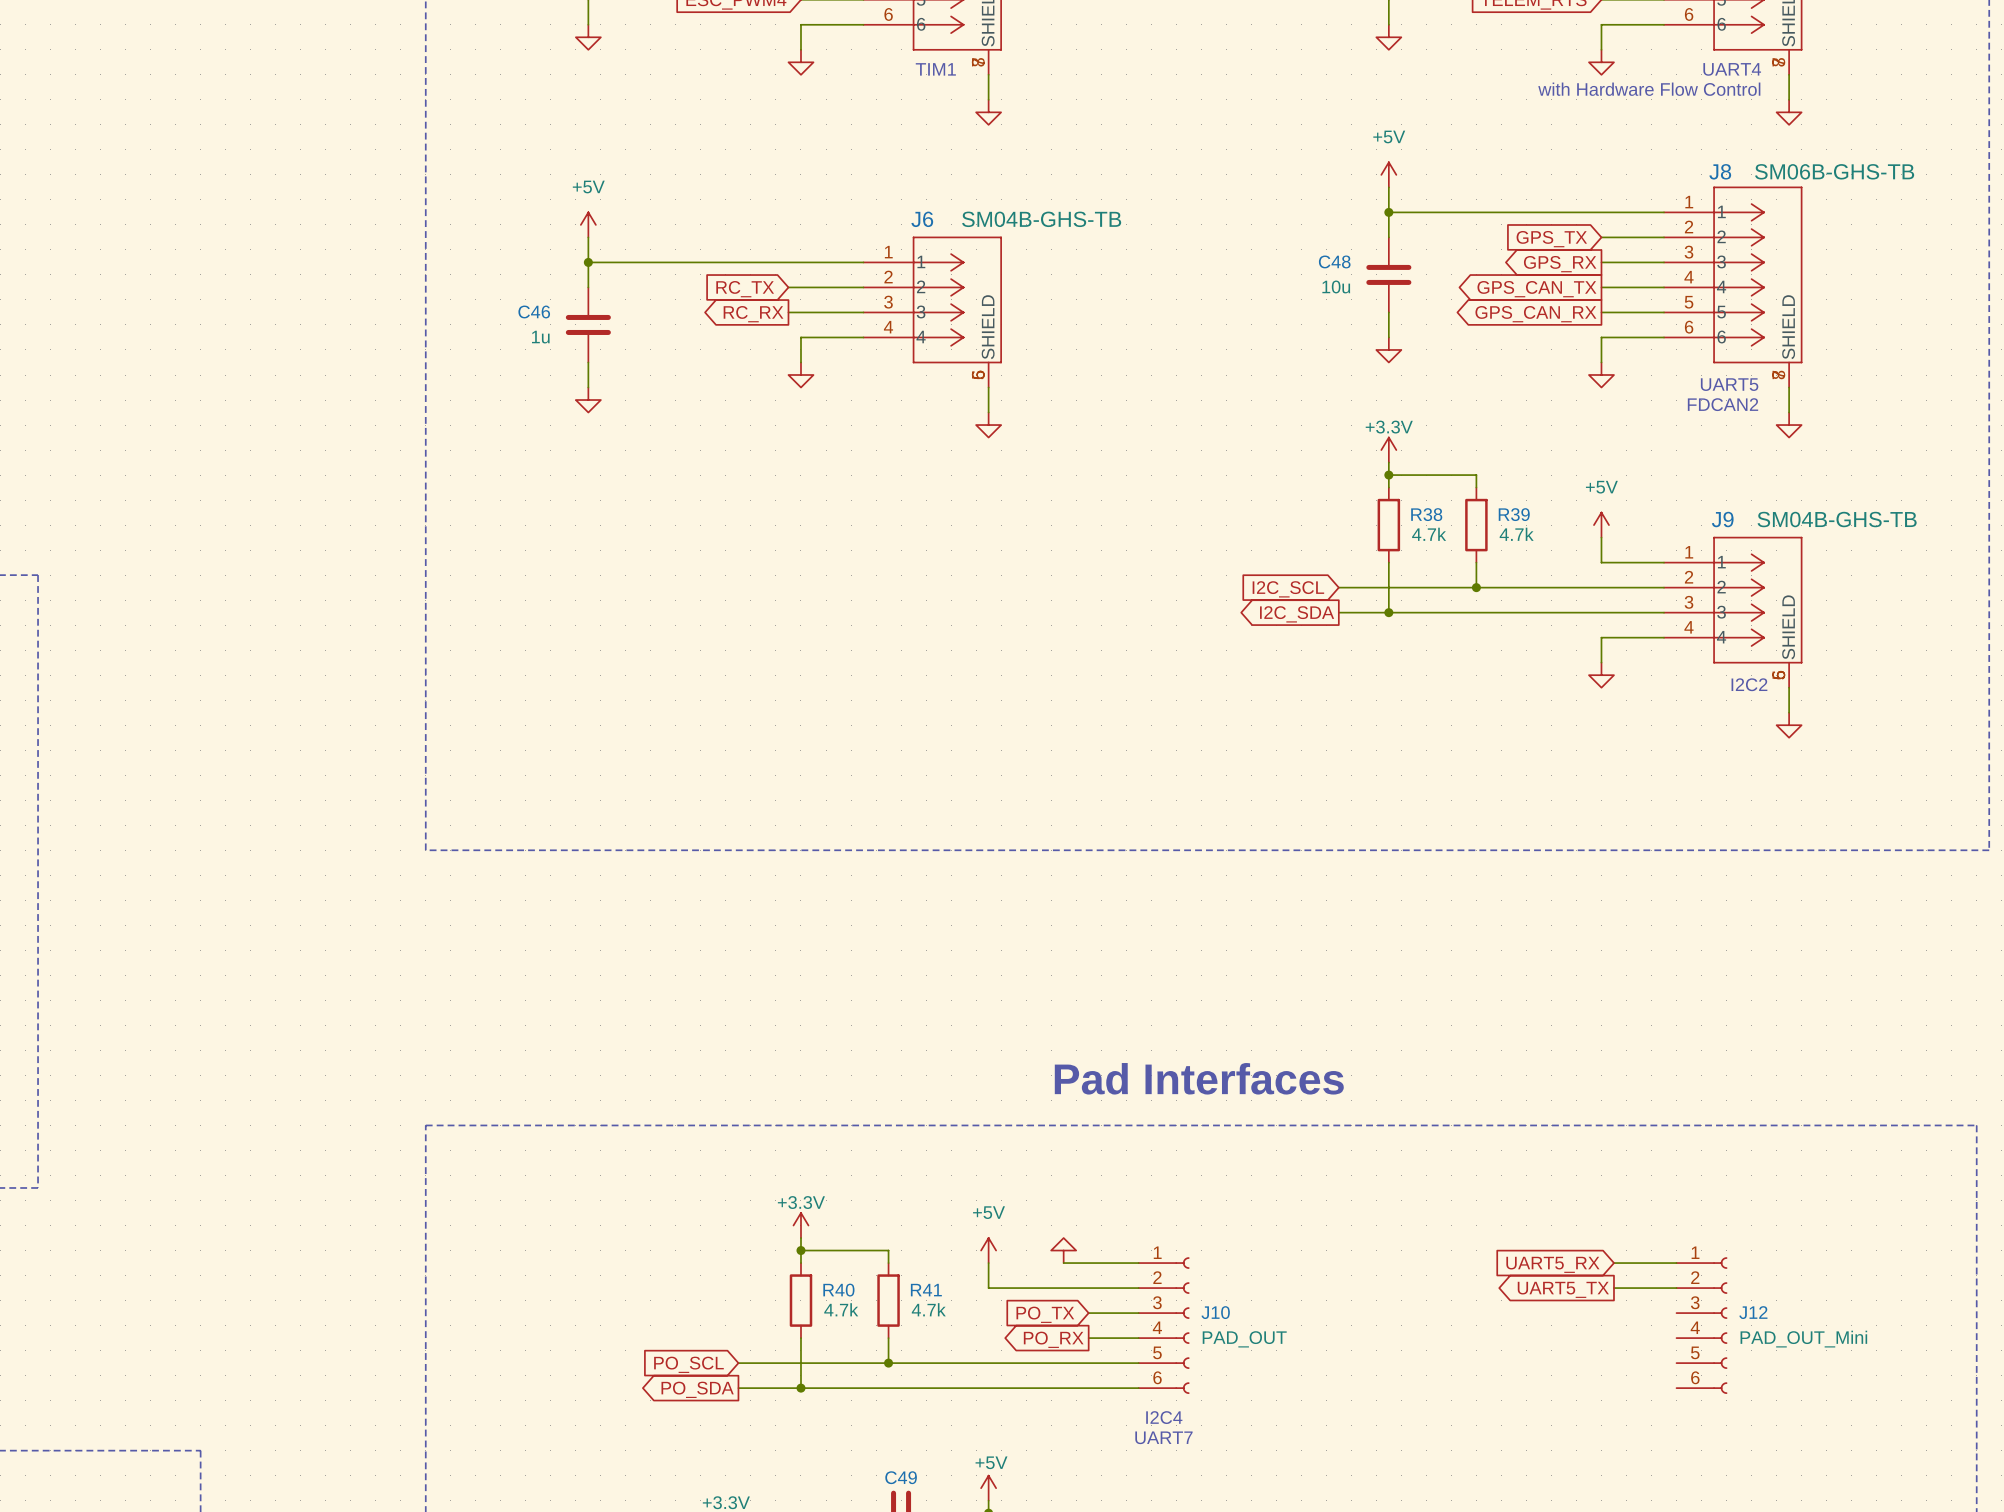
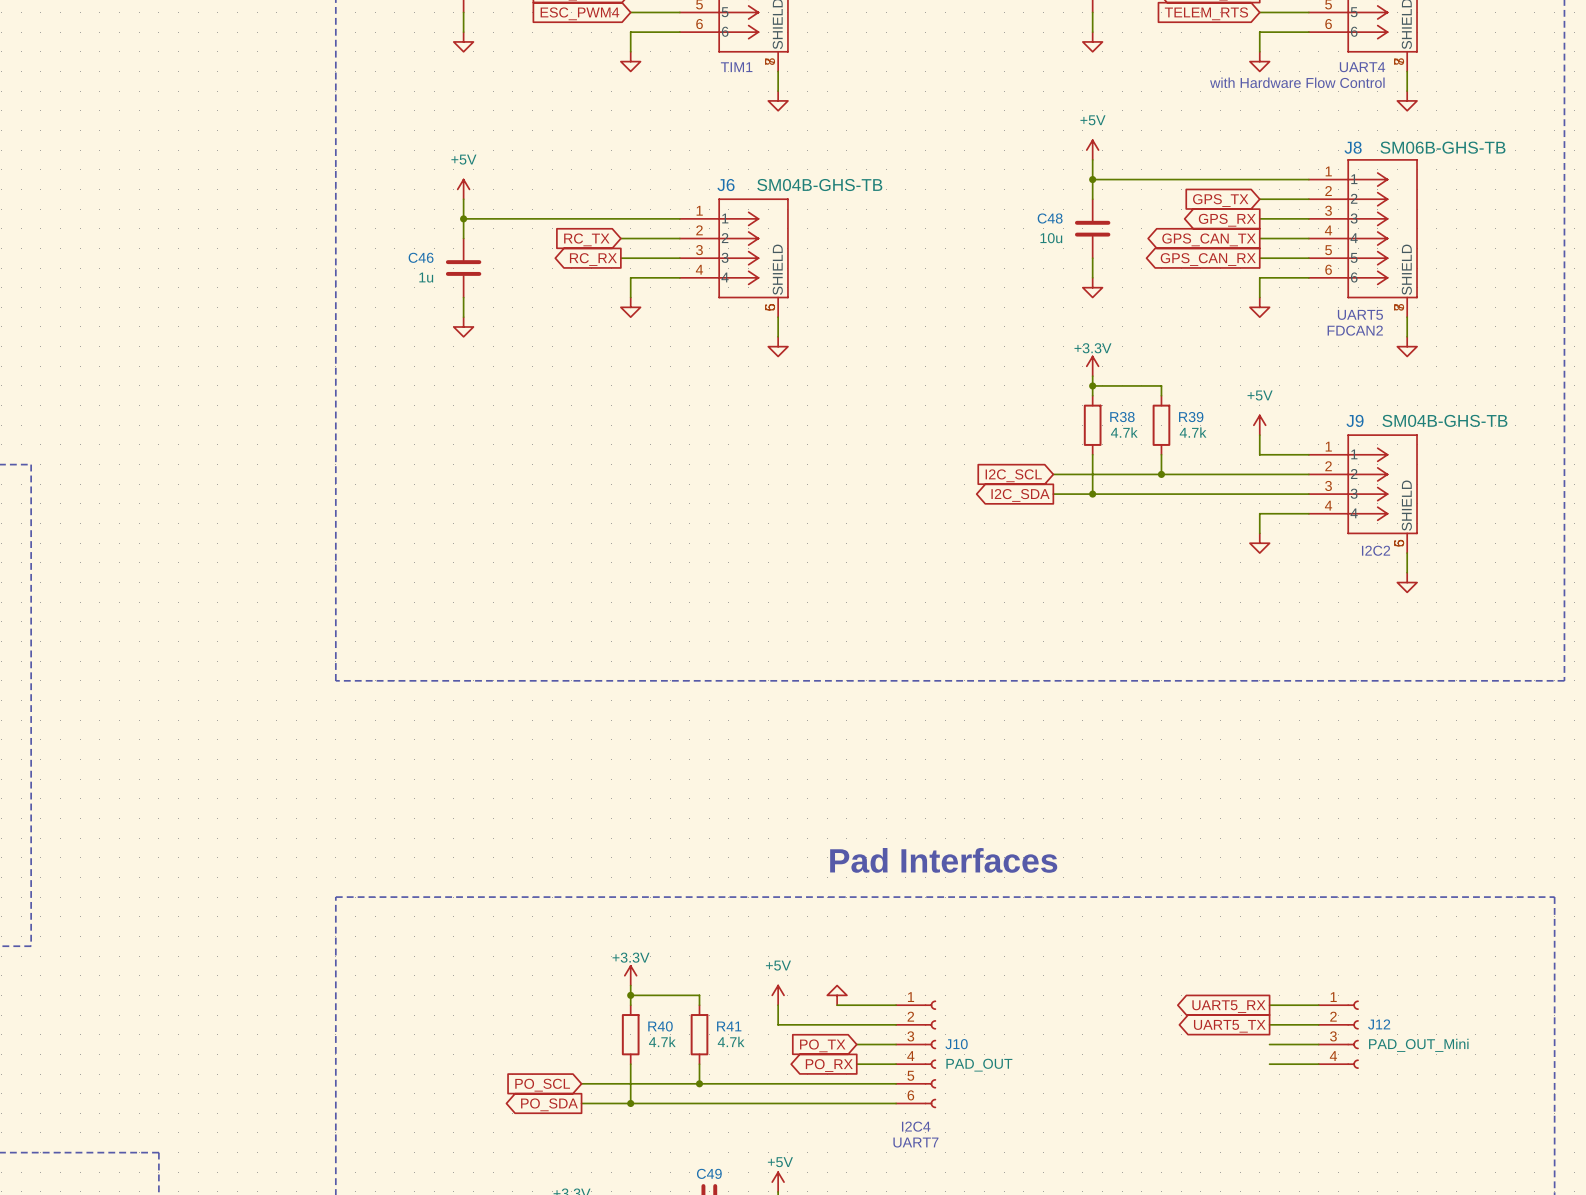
J12 symbol: [1676, 1257, 1728, 1394] -> [1318, 1000, 1359, 1069]
global label shape: input (1552, 1264) -> output (1228, 1006)
wire: none -> (1269, 1044) (1318, 1044)
wire: none -> (1269, 1064) (1318, 1064)

